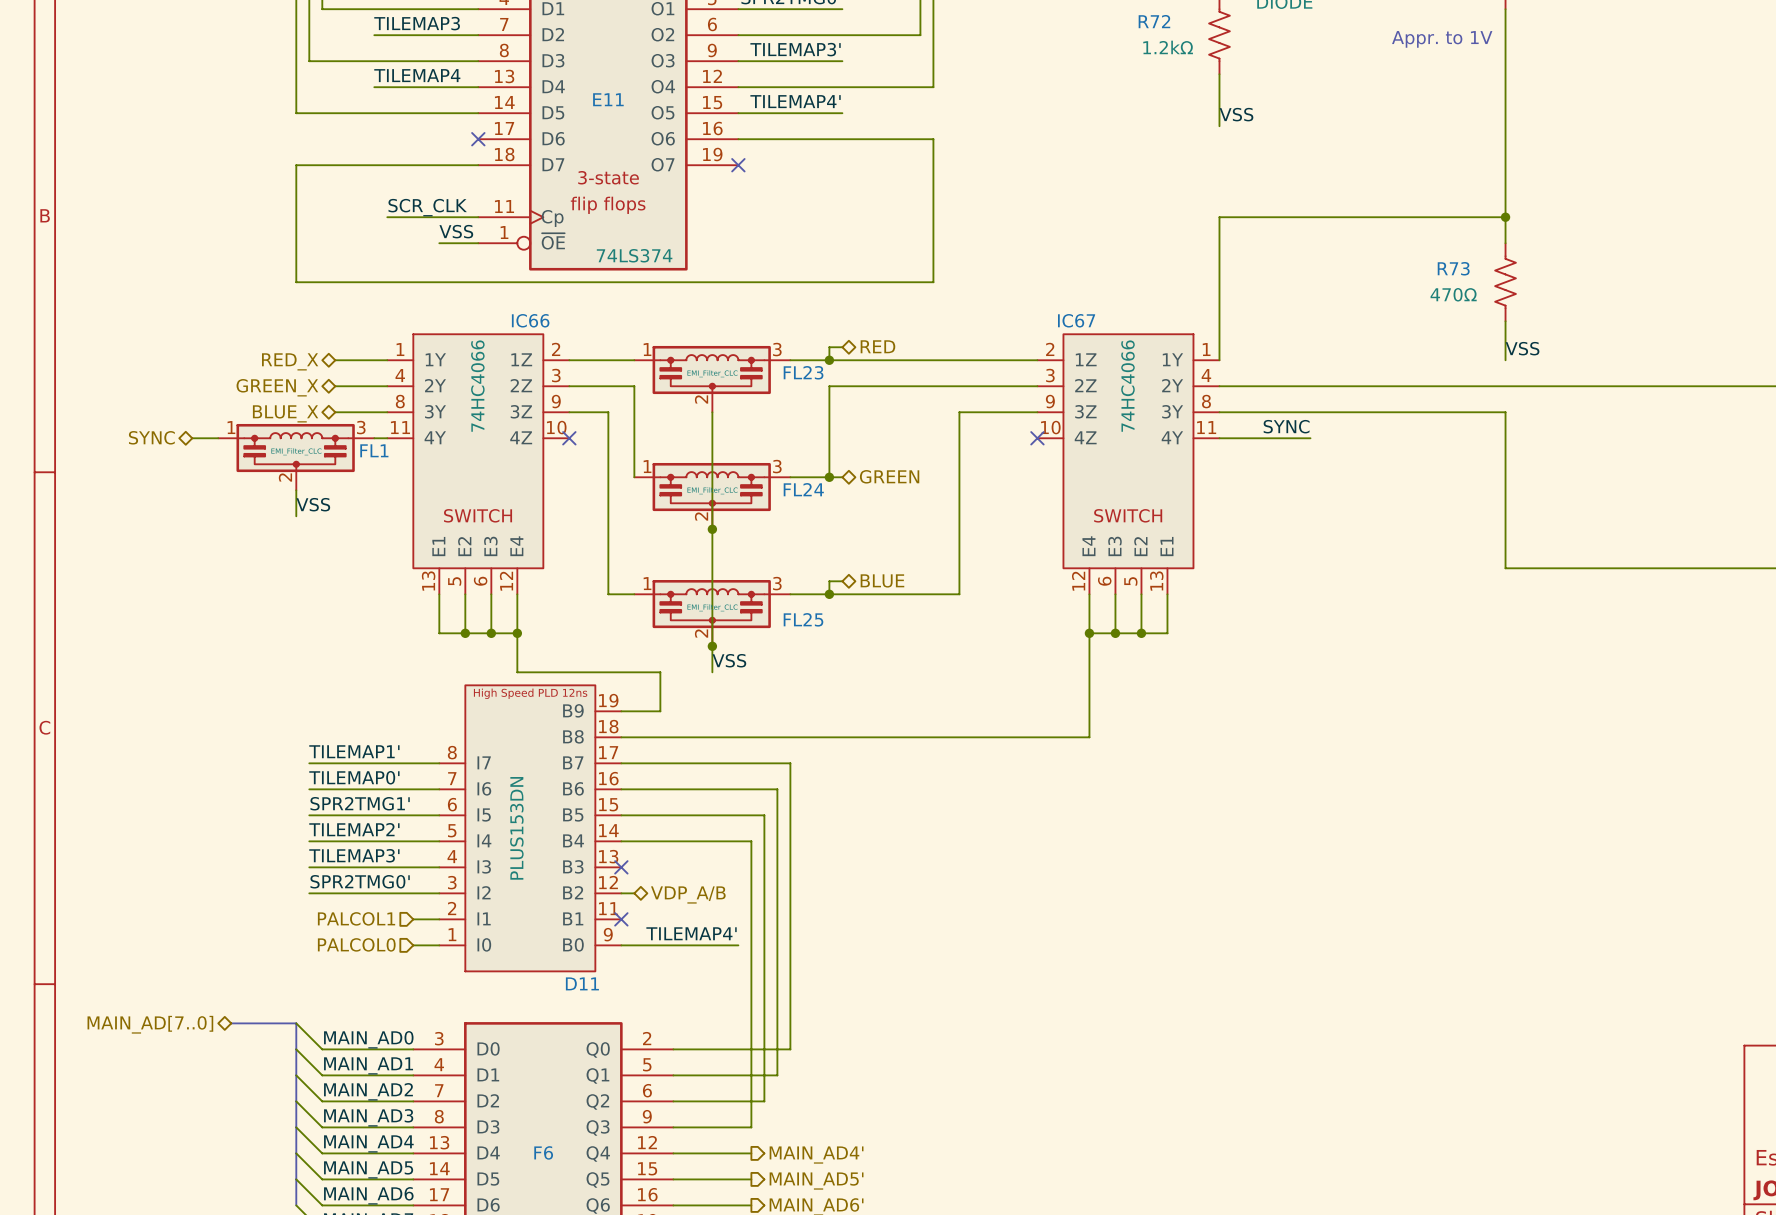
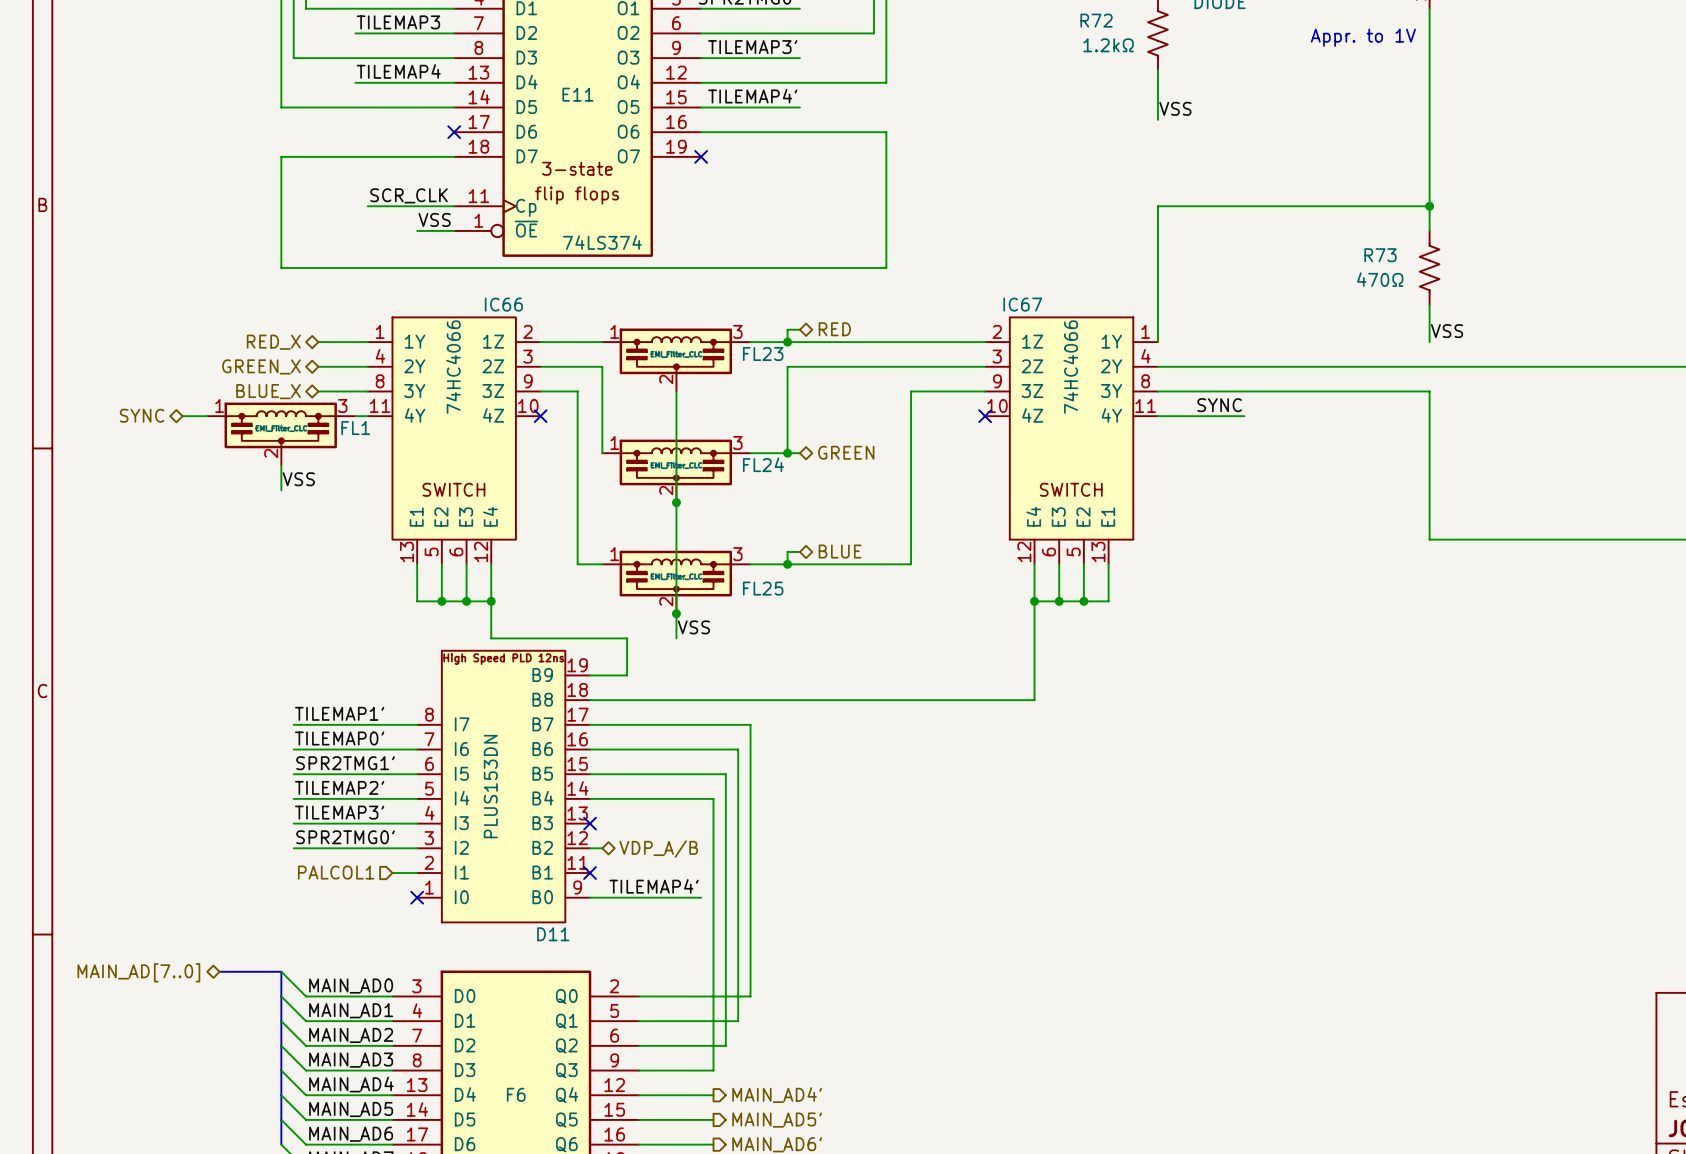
hierarchical label: PALCOL0 (356, 944) -> none
wire: (413, 945) (439, 945) -> none
no-connect mark: none -> (417, 897)

